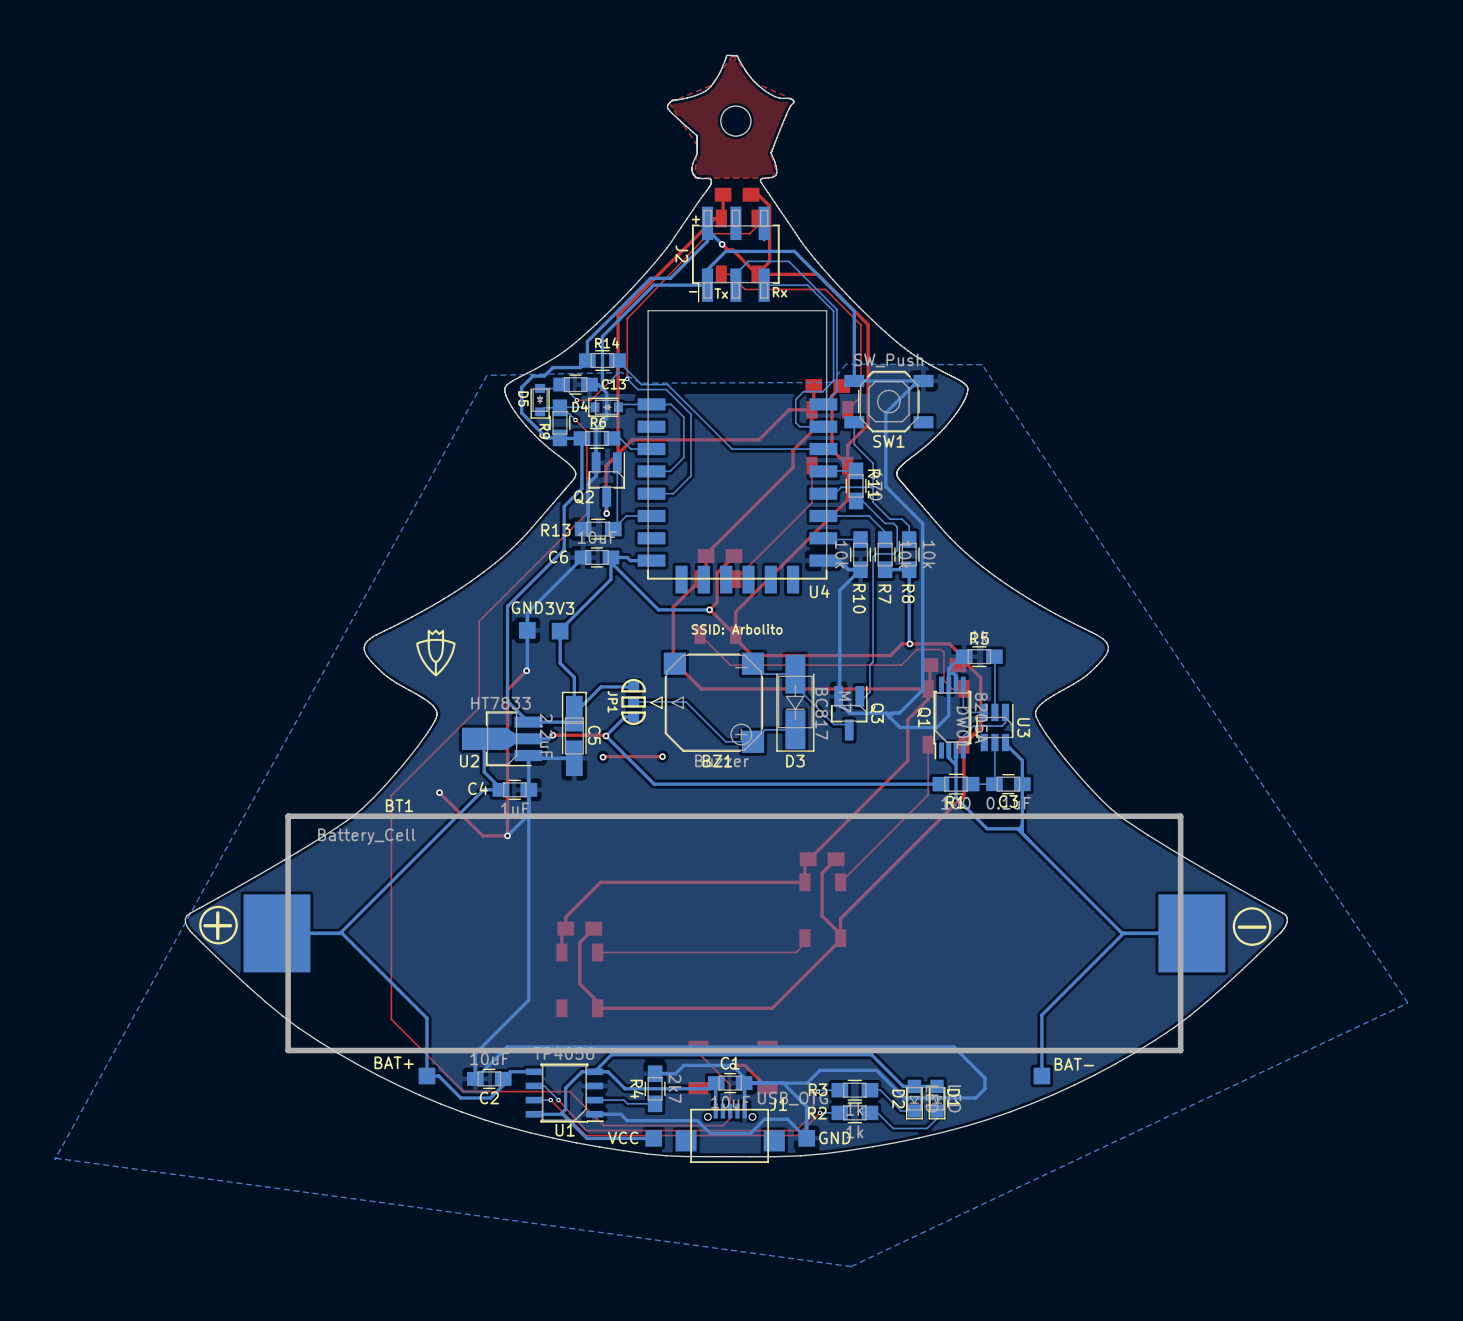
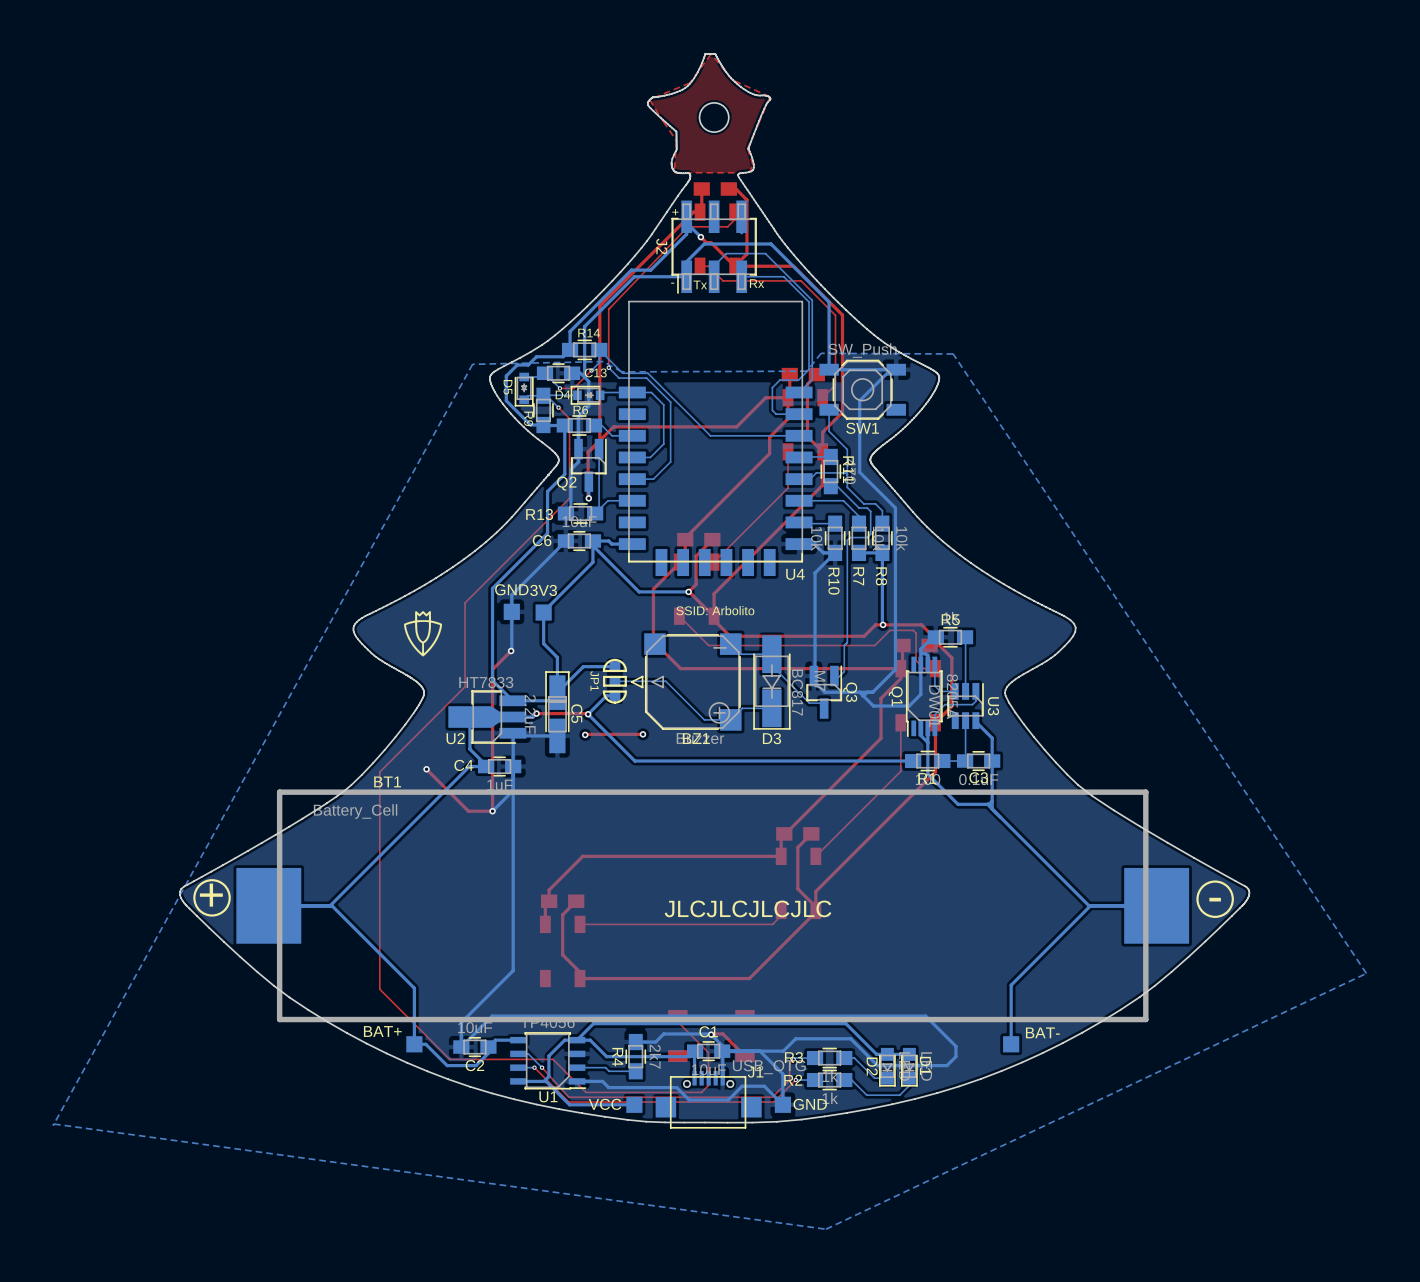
text: none -> JLCJLCJLCJLC (748, 908)

